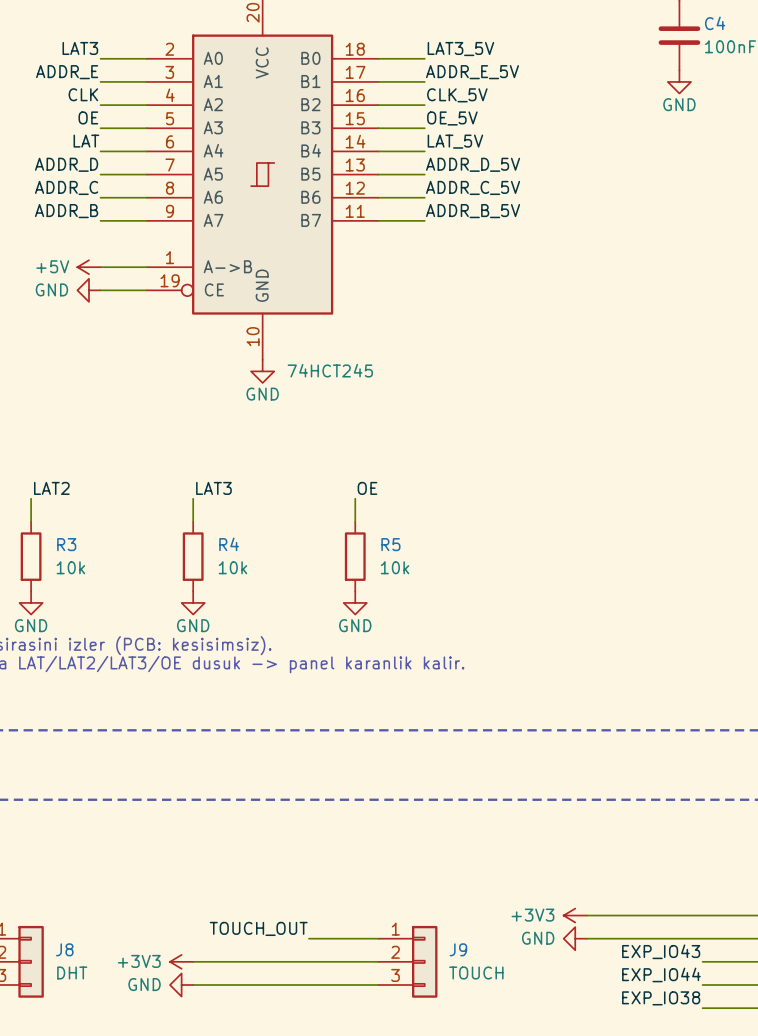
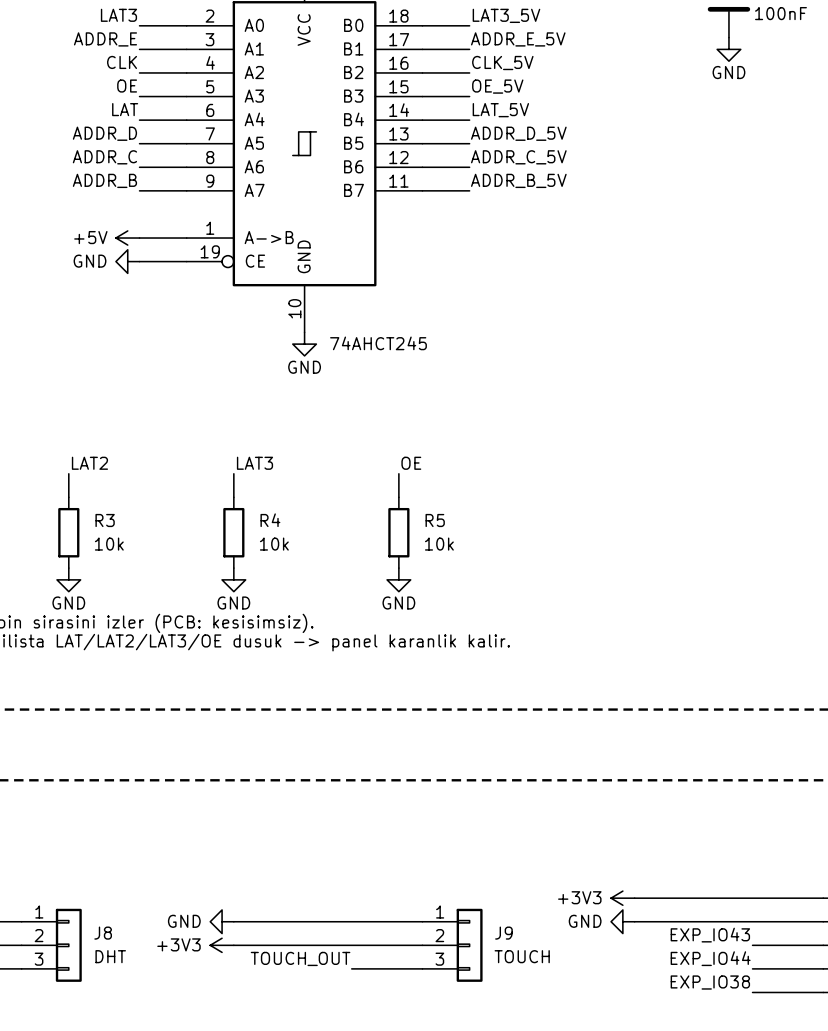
part value: 74HCT245 (330, 370) -> 74AHCT245 (378, 343)
label position: TOUCH_OUT (258, 928) -> TOUCH_OUT (300, 958)
power symbol position: GND (181, 985) -> GND (222, 921)
wire: (193, 985) (308, 985) -> (233, 921) (351, 921)

